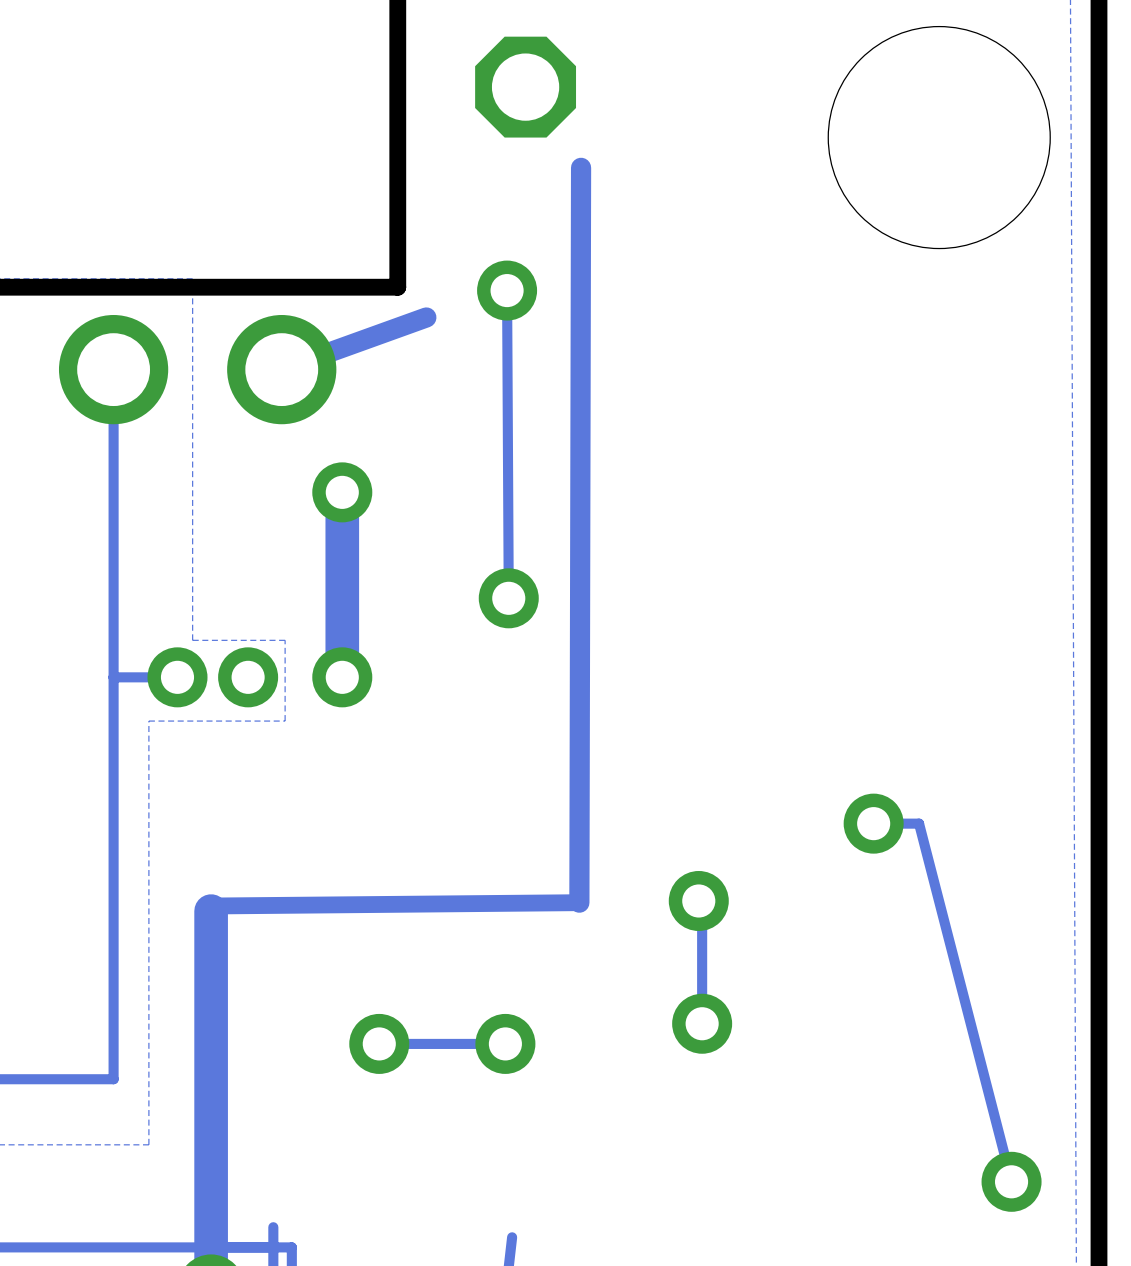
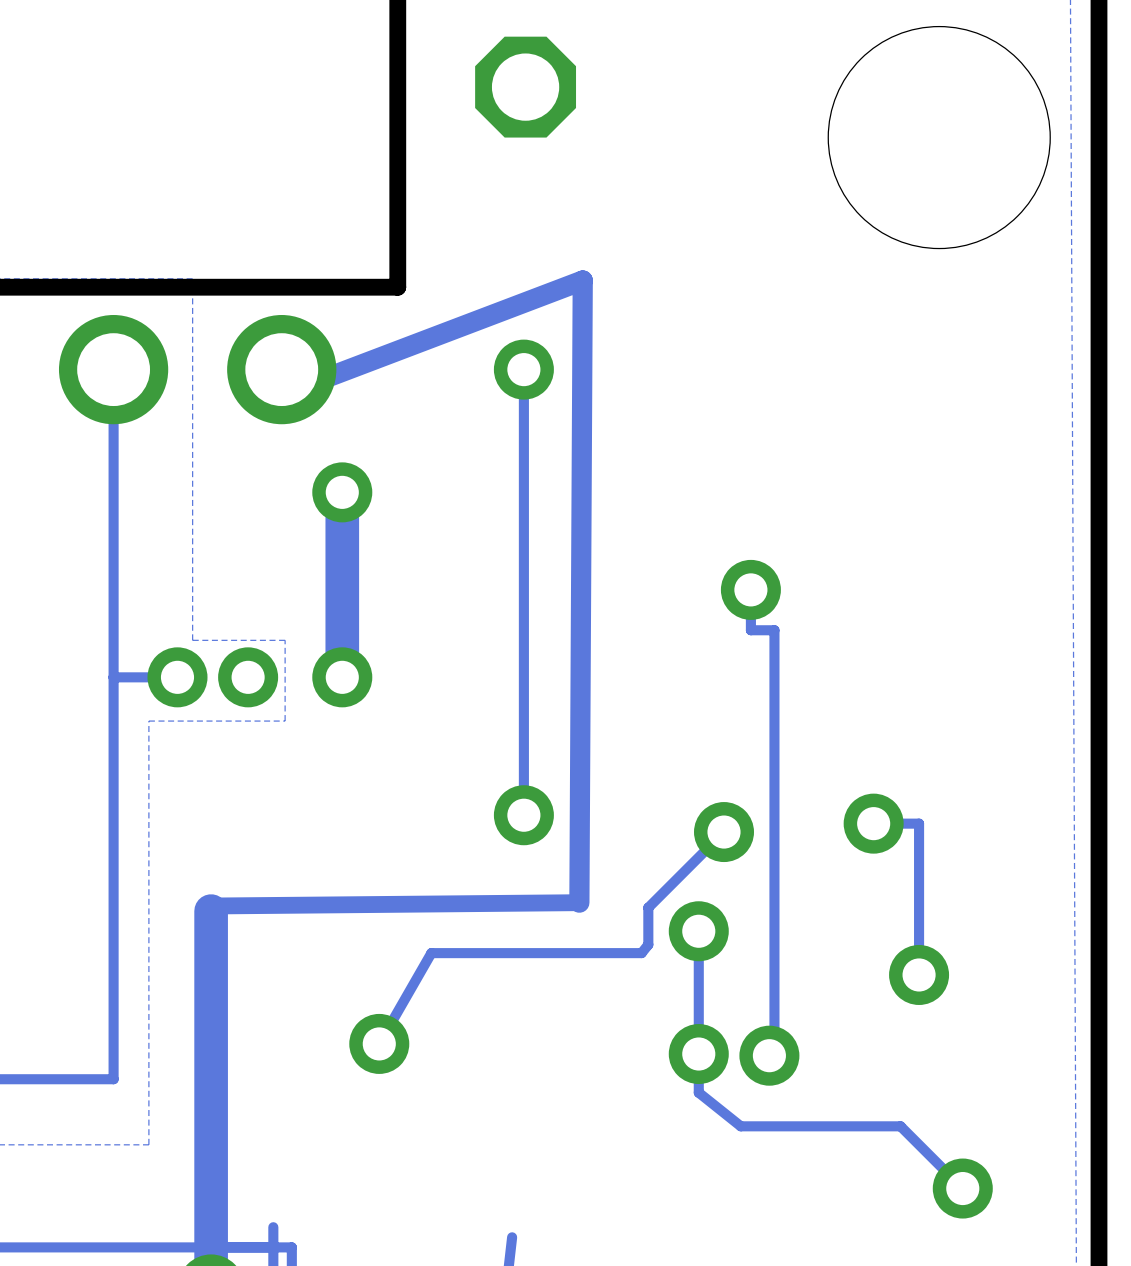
track: (581, 167) (579, 902) -> (281, 369) (281, 394) (582, 280) (579, 902)
track: (507, 290) (508, 598) -> none
via position: (507, 290) -> (523, 369)
track: (426, 317) (281, 369) -> none
track: none -> (523, 369) (523, 815)
track: none -> (750, 589) (750, 630) (774, 630) (774, 1055) (750, 1055)
via: none -> (750, 589)
via: (508, 598) -> none
via: none -> (523, 815)
track: (919, 823) (1011, 1181) -> (919, 823) (919, 974)
via: none -> (724, 832)
track: (698, 900) (702, 900) (702, 1023) -> none
via position: (698, 900) -> (698, 931)
track: none -> (698, 931) (698, 1092) (740, 1126) (900, 1126) (962, 1188)
via: none -> (919, 974)
via position: (702, 1023) -> (698, 1054)
track: (505, 1043) (379, 1043) -> (724, 832) (648, 907) (648, 944) (641, 953) (431, 953) (379, 1043)
via: (505, 1043) -> none
via: none -> (769, 1055)
via position: (1011, 1181) -> (962, 1188)

